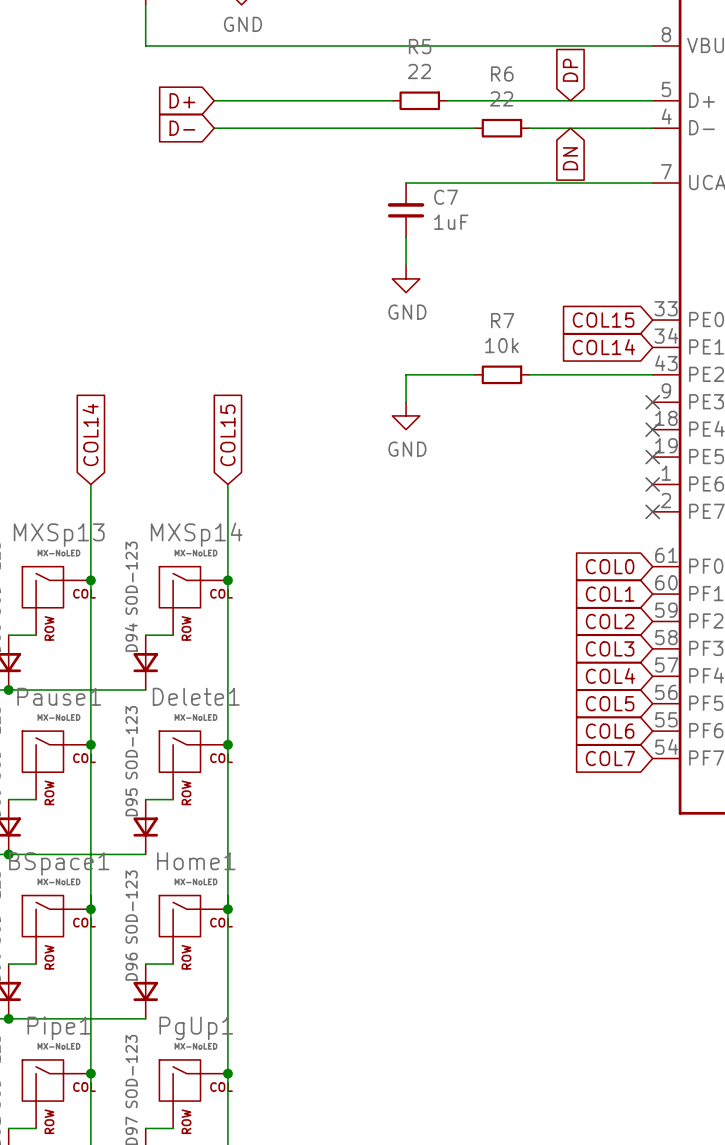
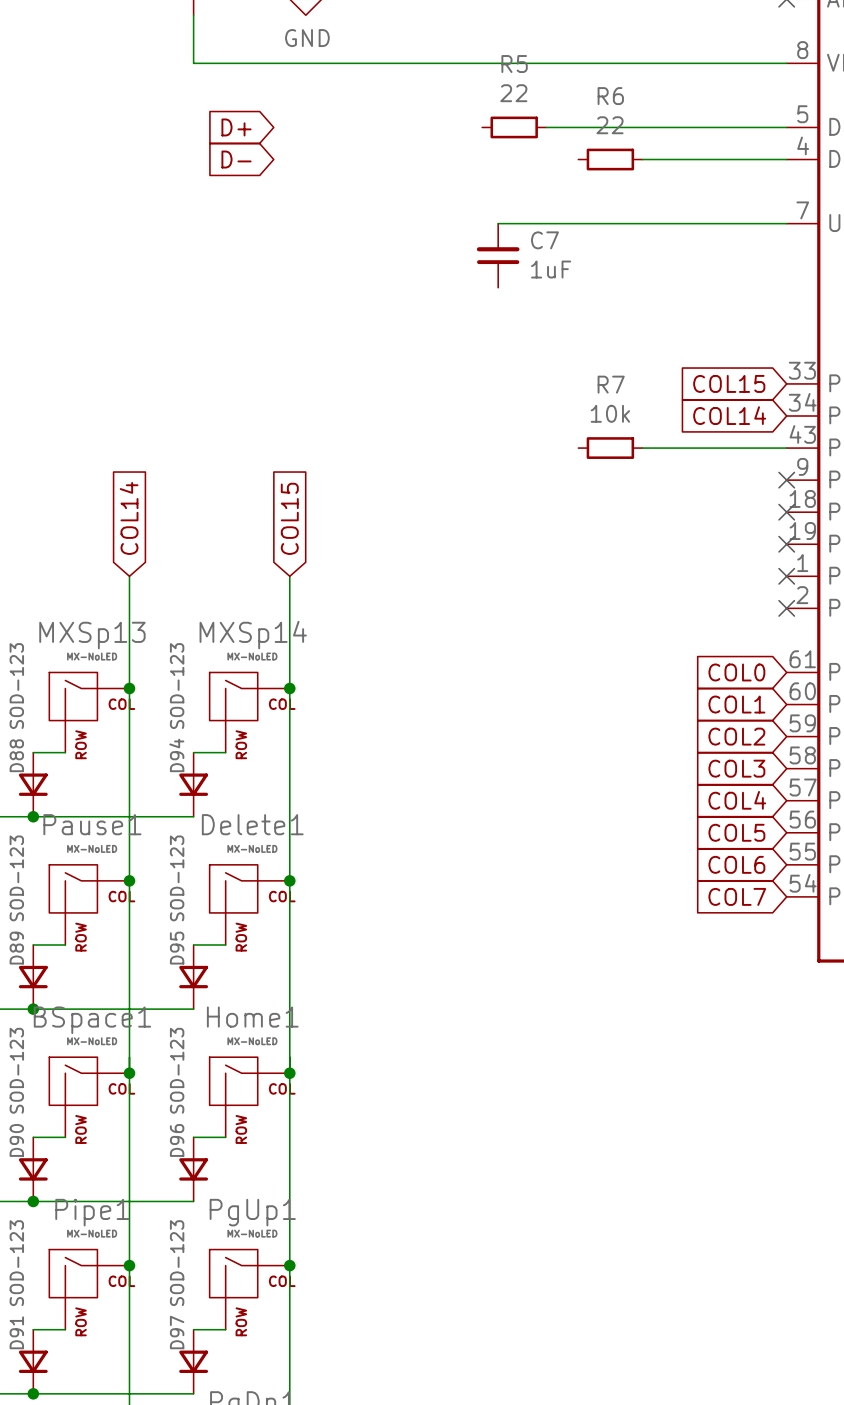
global label: DP (570, 70) -> none
wire: (214, 100) (392, 100) -> none
wire: (214, 128) (474, 128) -> none
global label: DN (570, 158) -> none
wire: (406, 237) (406, 265) -> none
power symbol: GND (406, 278) -> none
wire: (474, 374) (406, 374) (406, 402) -> none
power symbol: GND (406, 415) -> none

